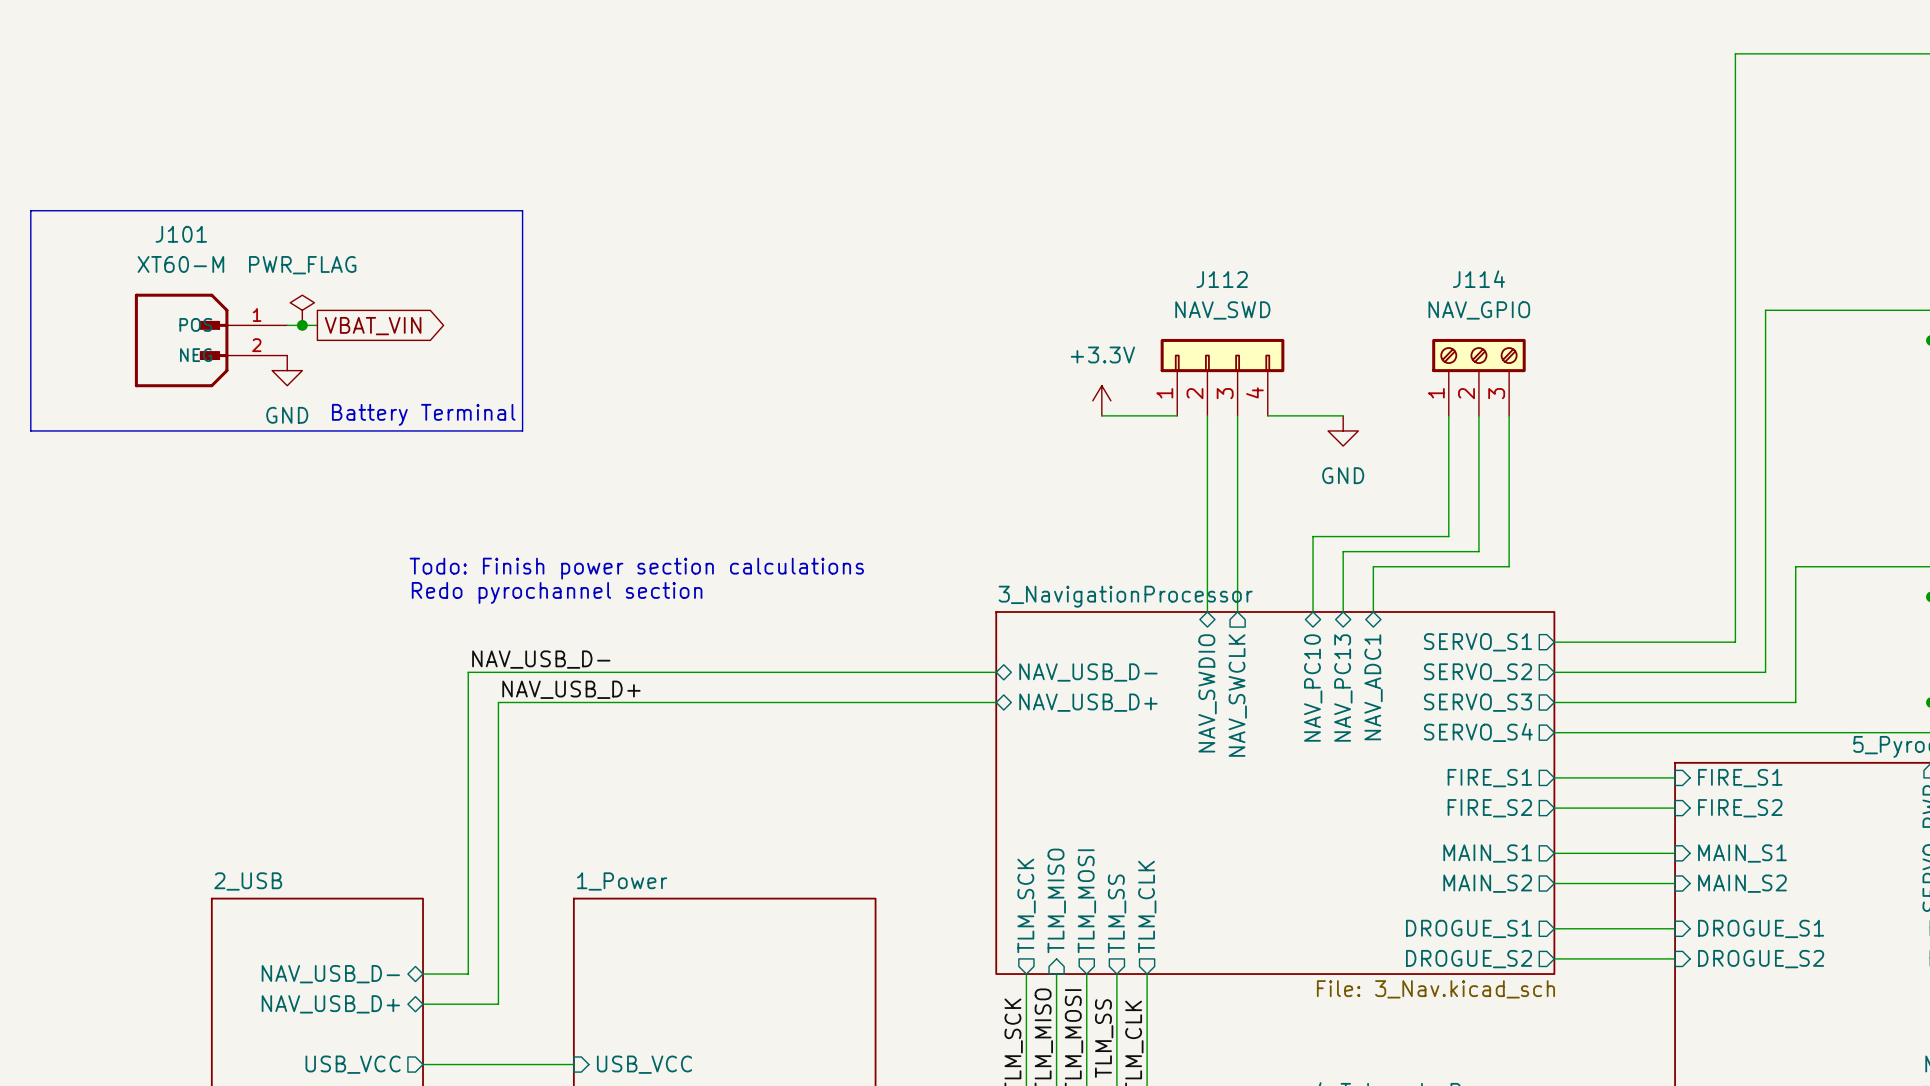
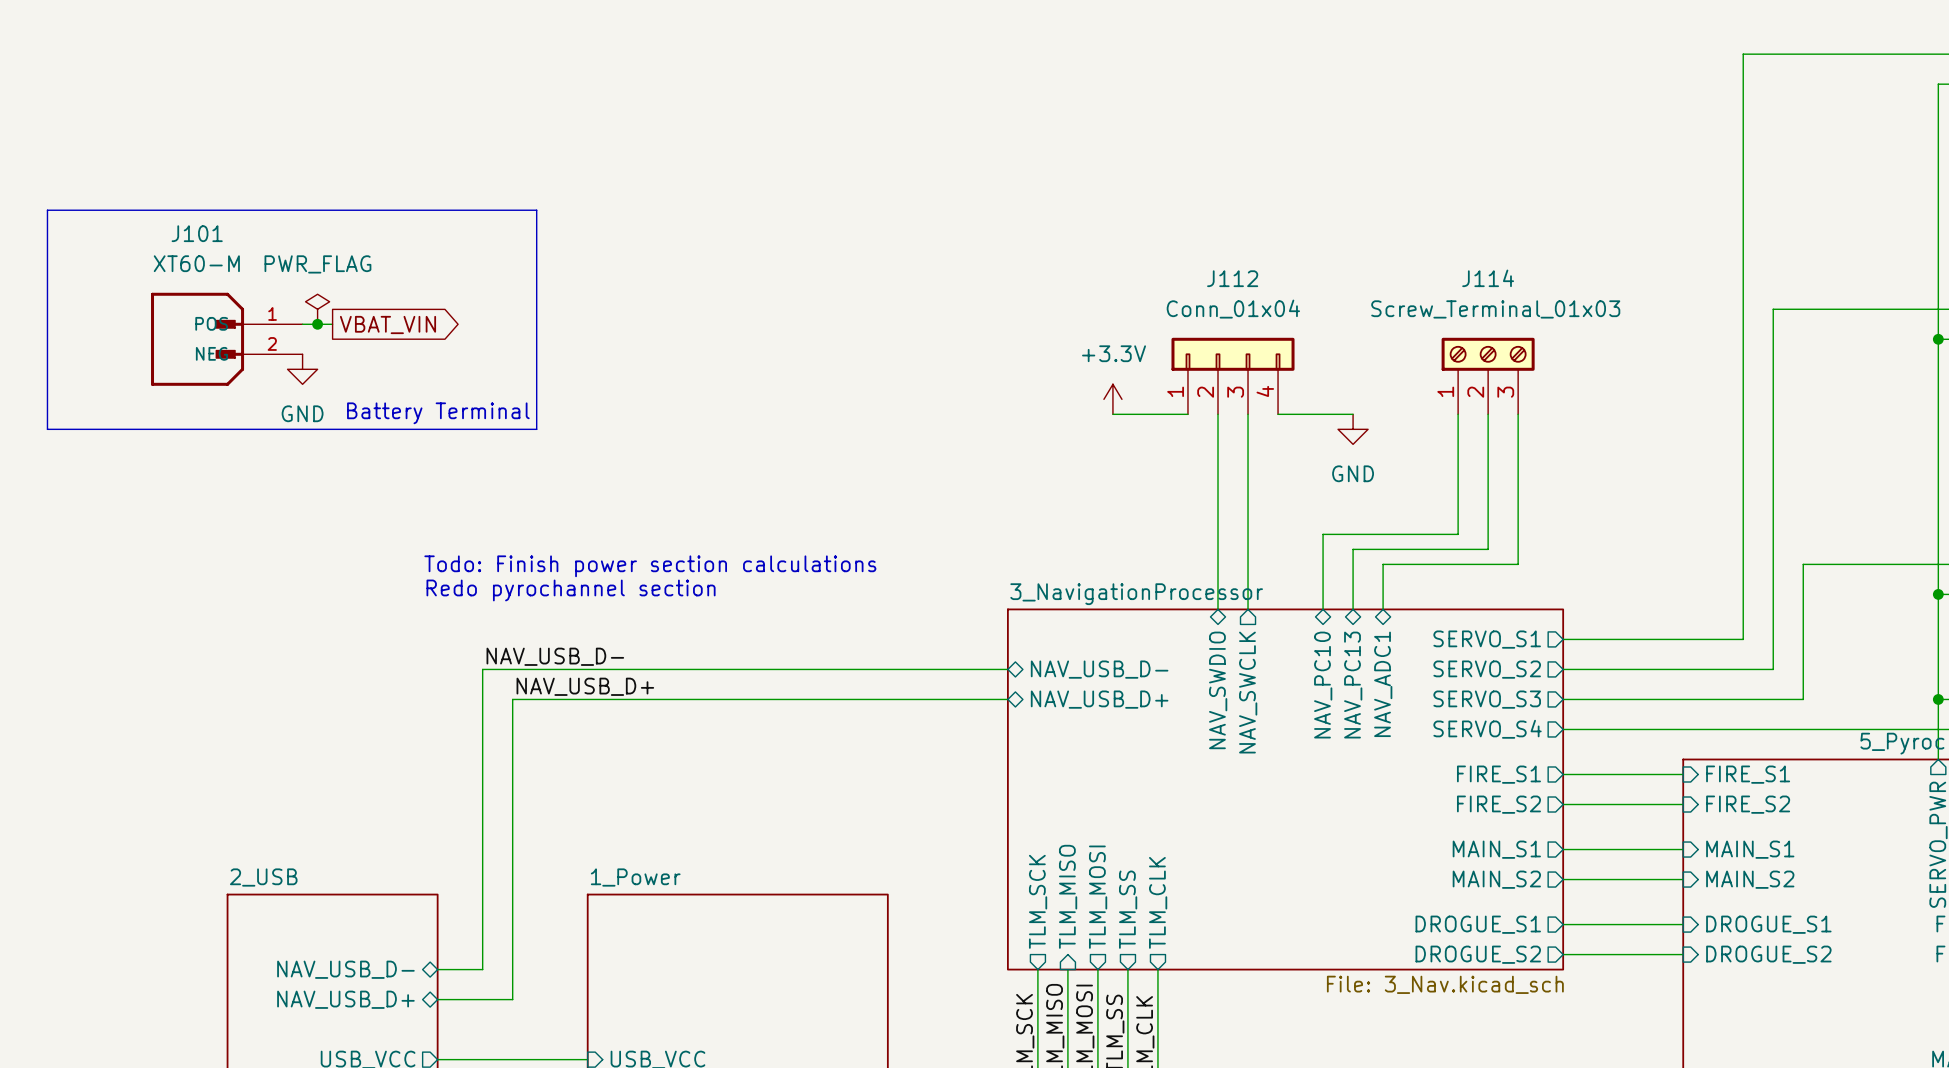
J112 value: NAV_SWD (1222, 310) -> Conn_01x04 (1233, 309)
J114 value: NAV_GPIO (1479, 310) -> Screw_Terminal_01x03 (1495, 309)

